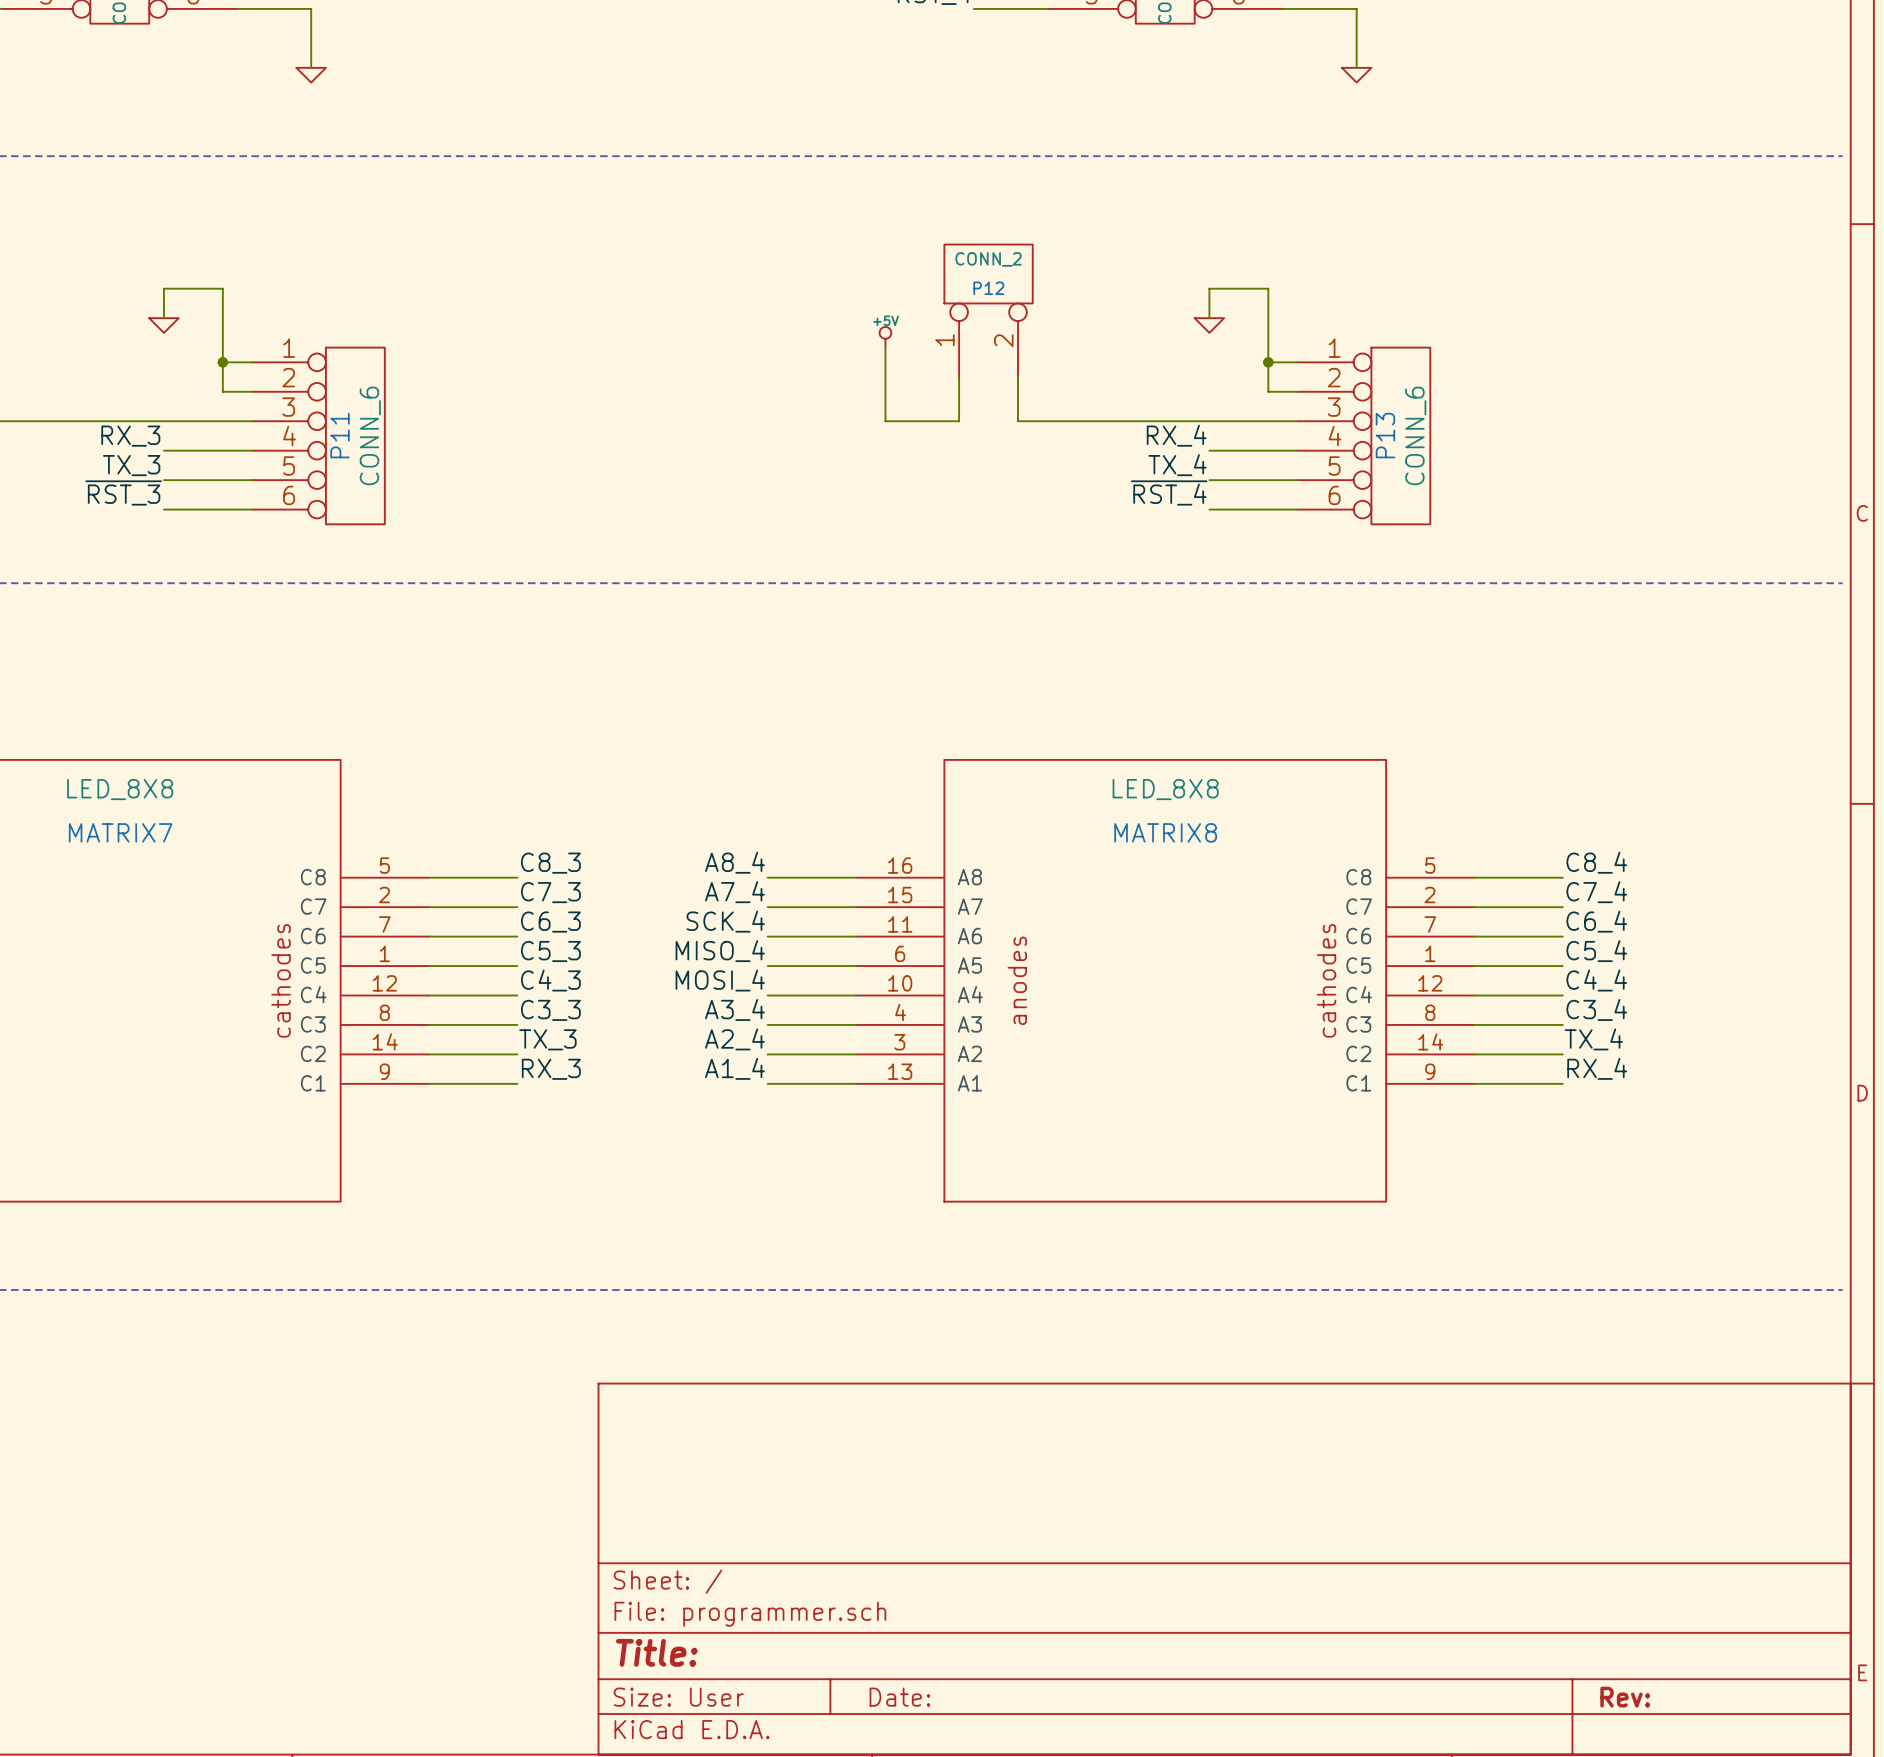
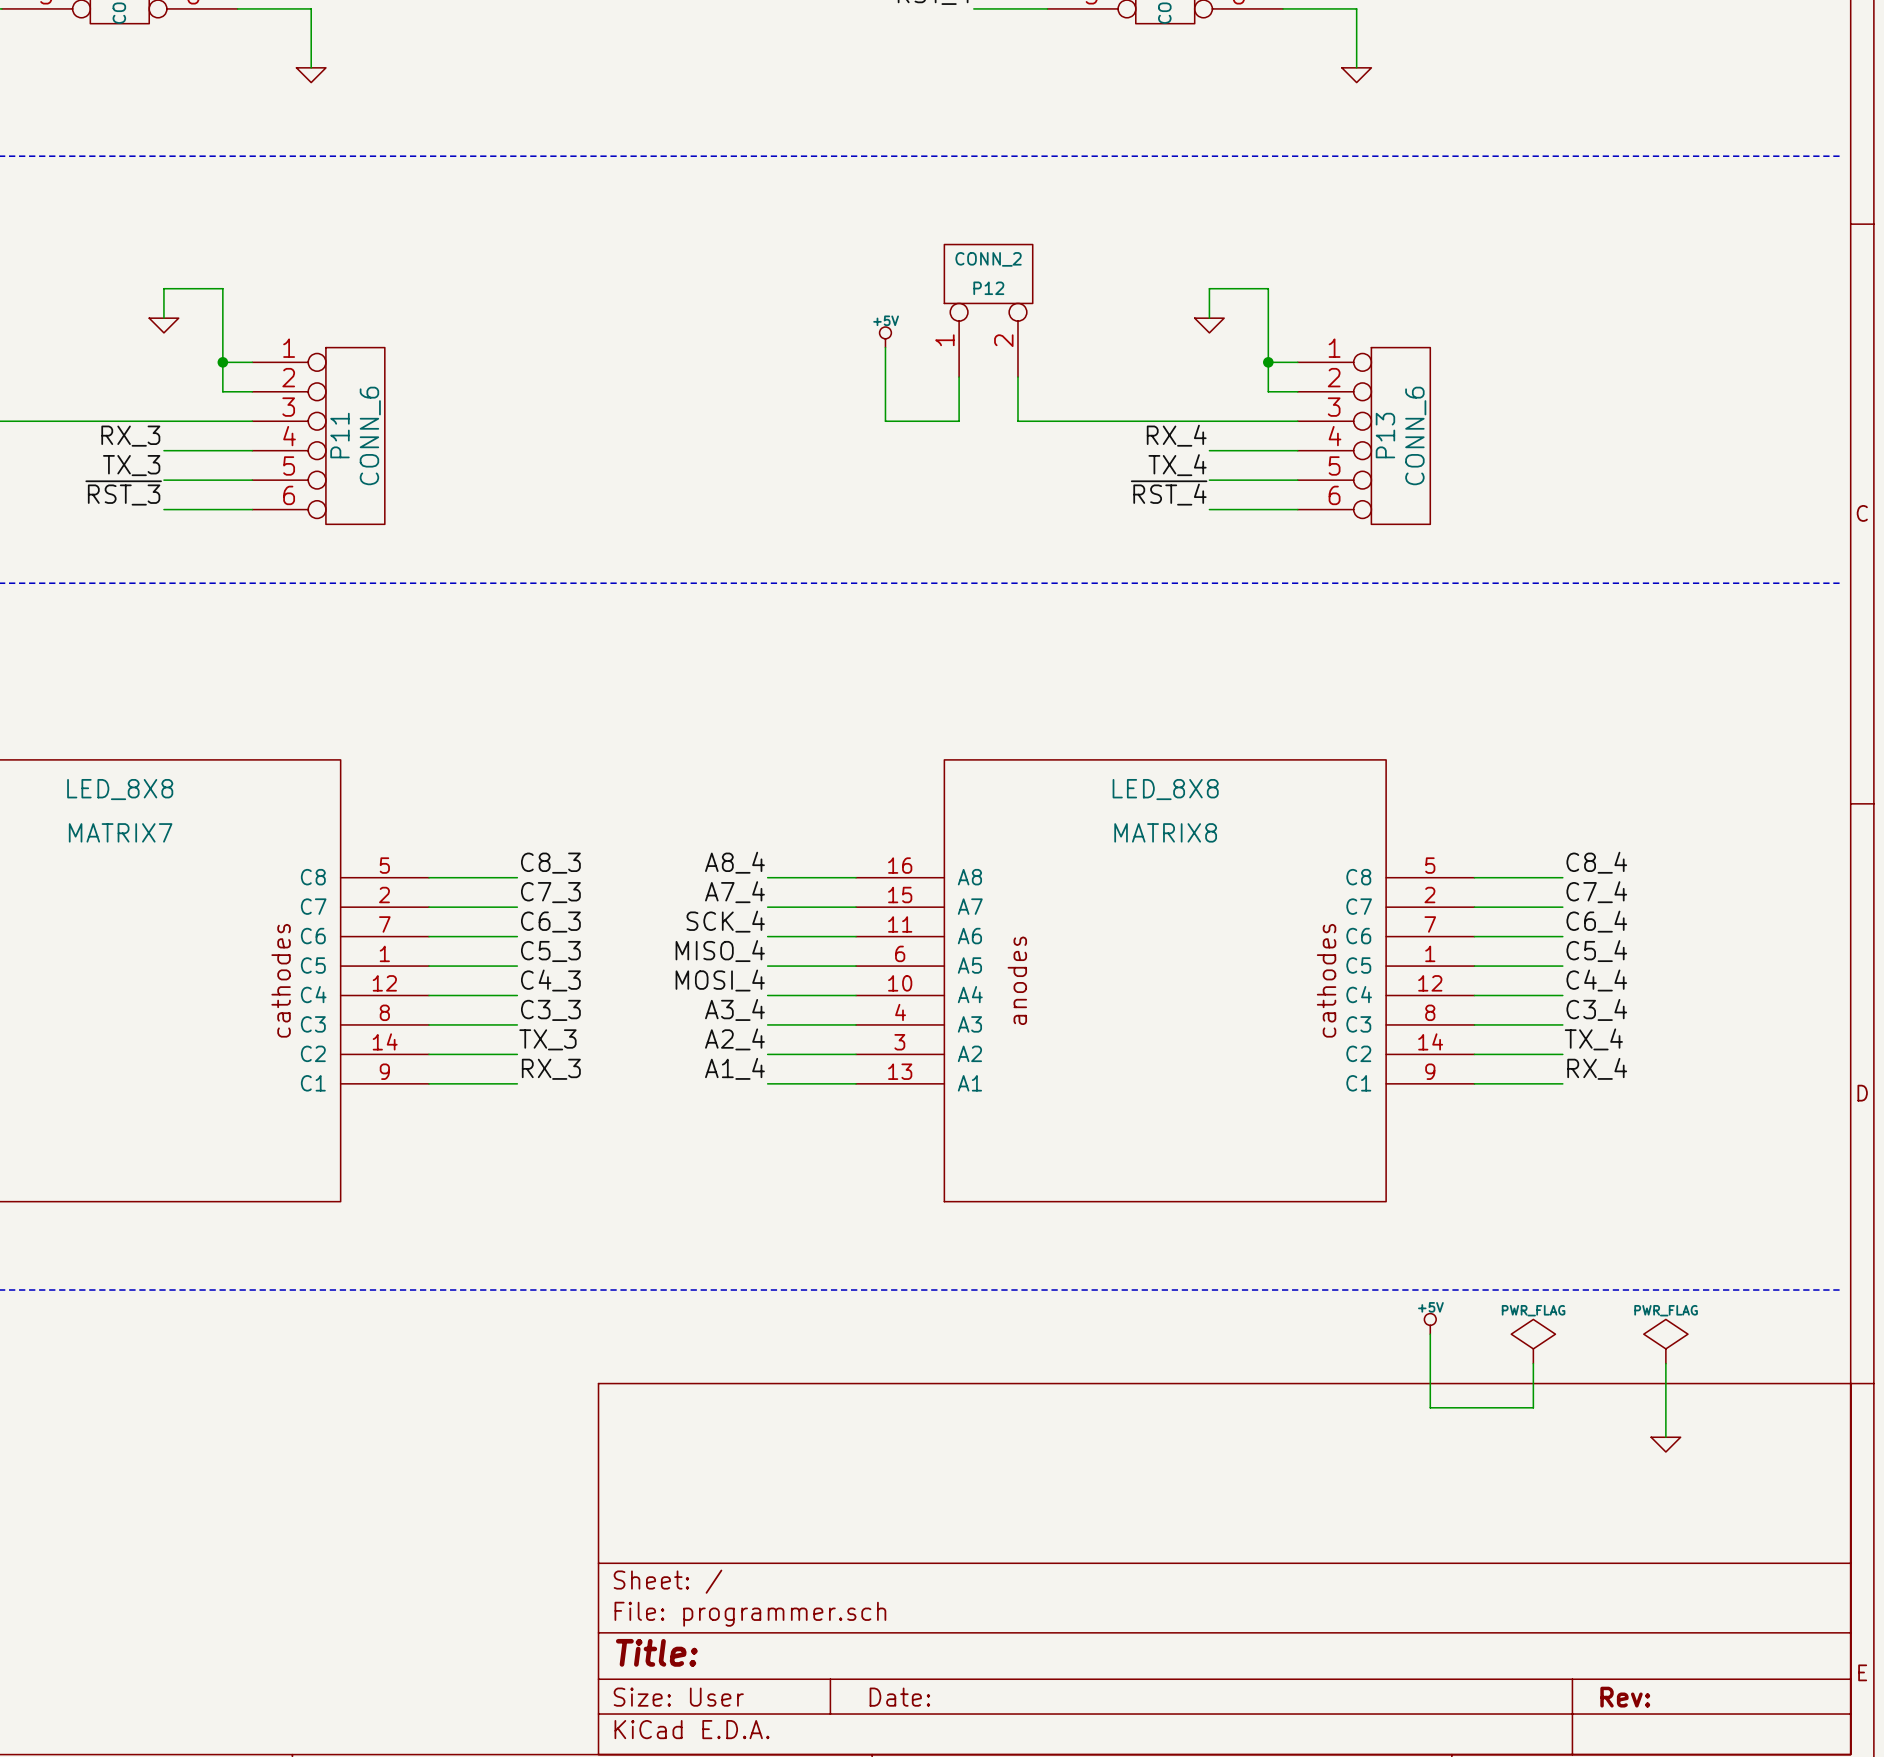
power symbol: none -> +5V (1430, 1323)
wire: none -> (1430, 1334) (1430, 1407) (1533, 1407) (1533, 1363)
power symbol: none -> PWR_FLAG (1533, 1341)
power symbol: none -> PWR_FLAG (1665, 1341)
wire: none -> (1665, 1363) (1665, 1437)
power symbol: none -> (1665, 1444)

